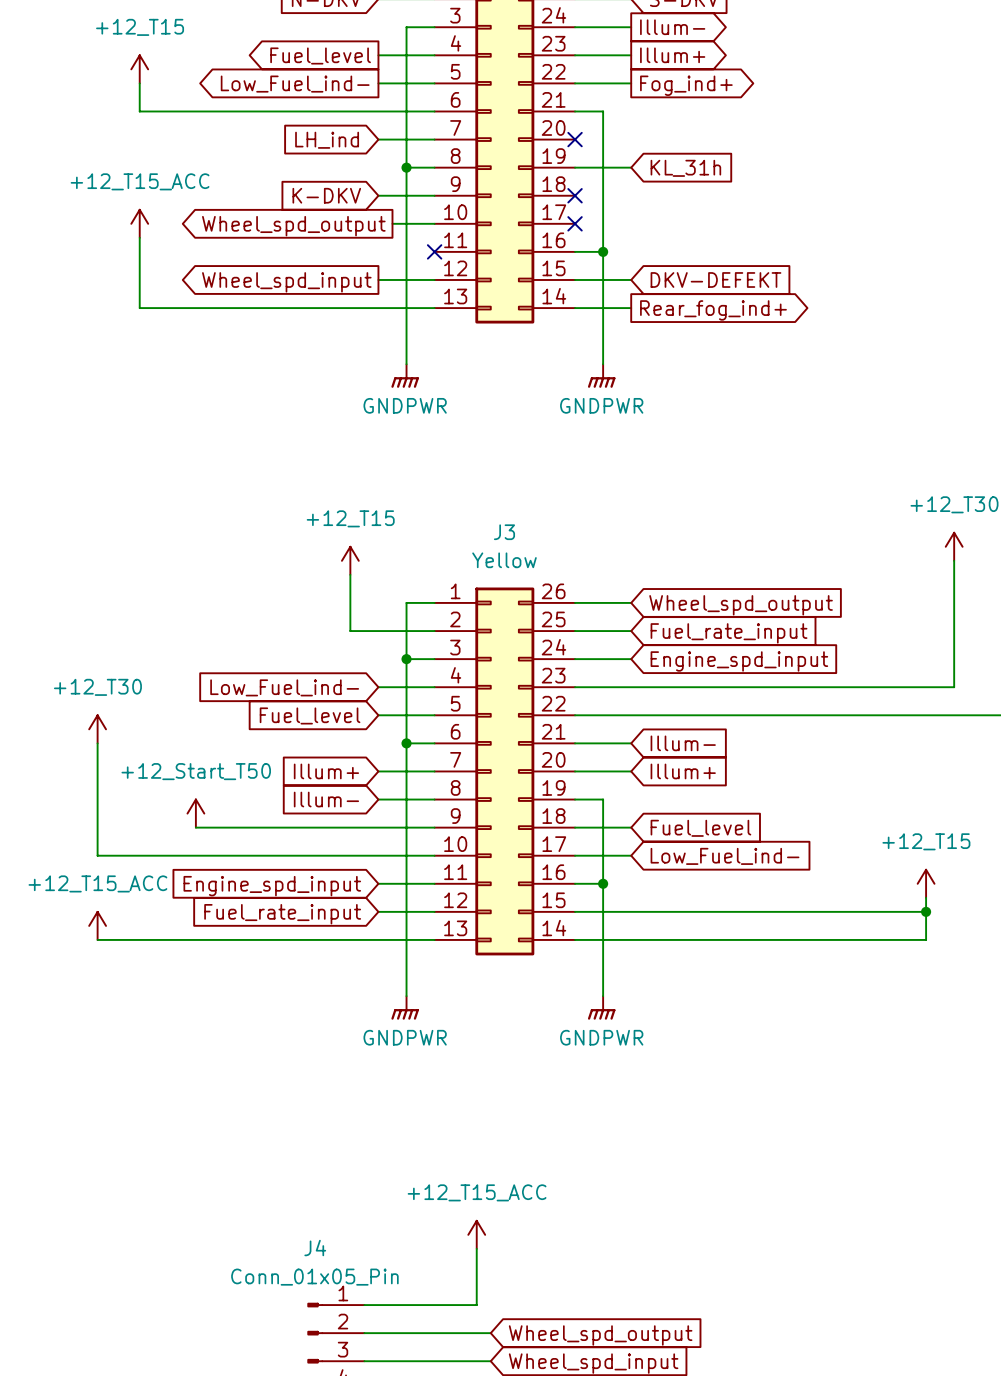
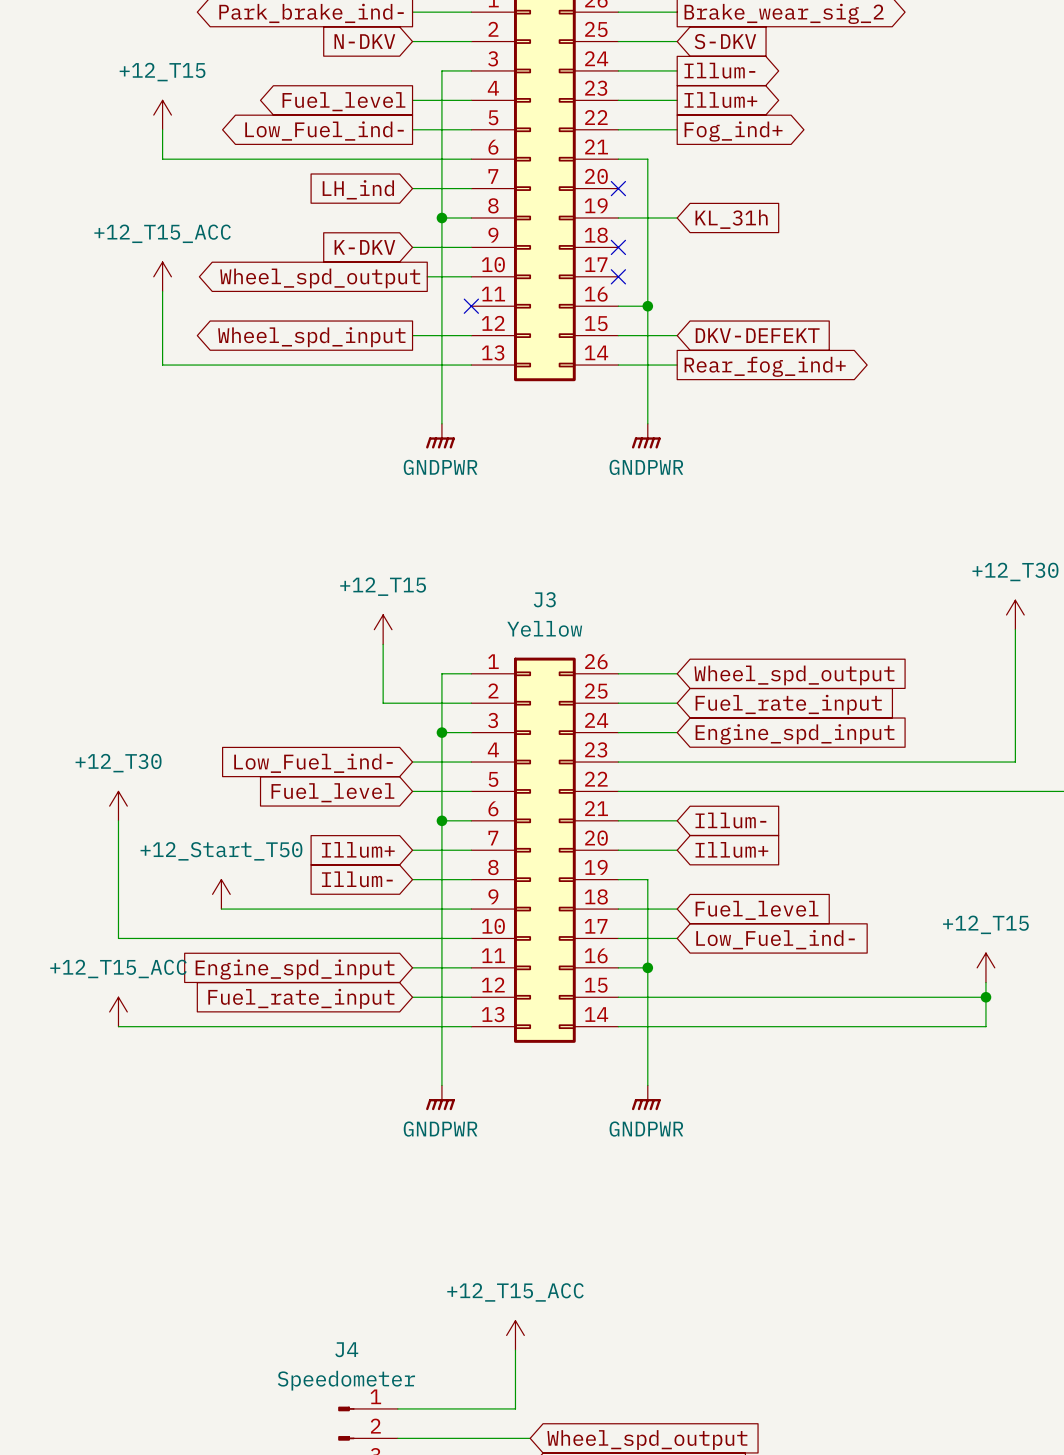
J4 value: Conn_01x05_Pin (314, 1277) -> Speedometer (346, 1380)

